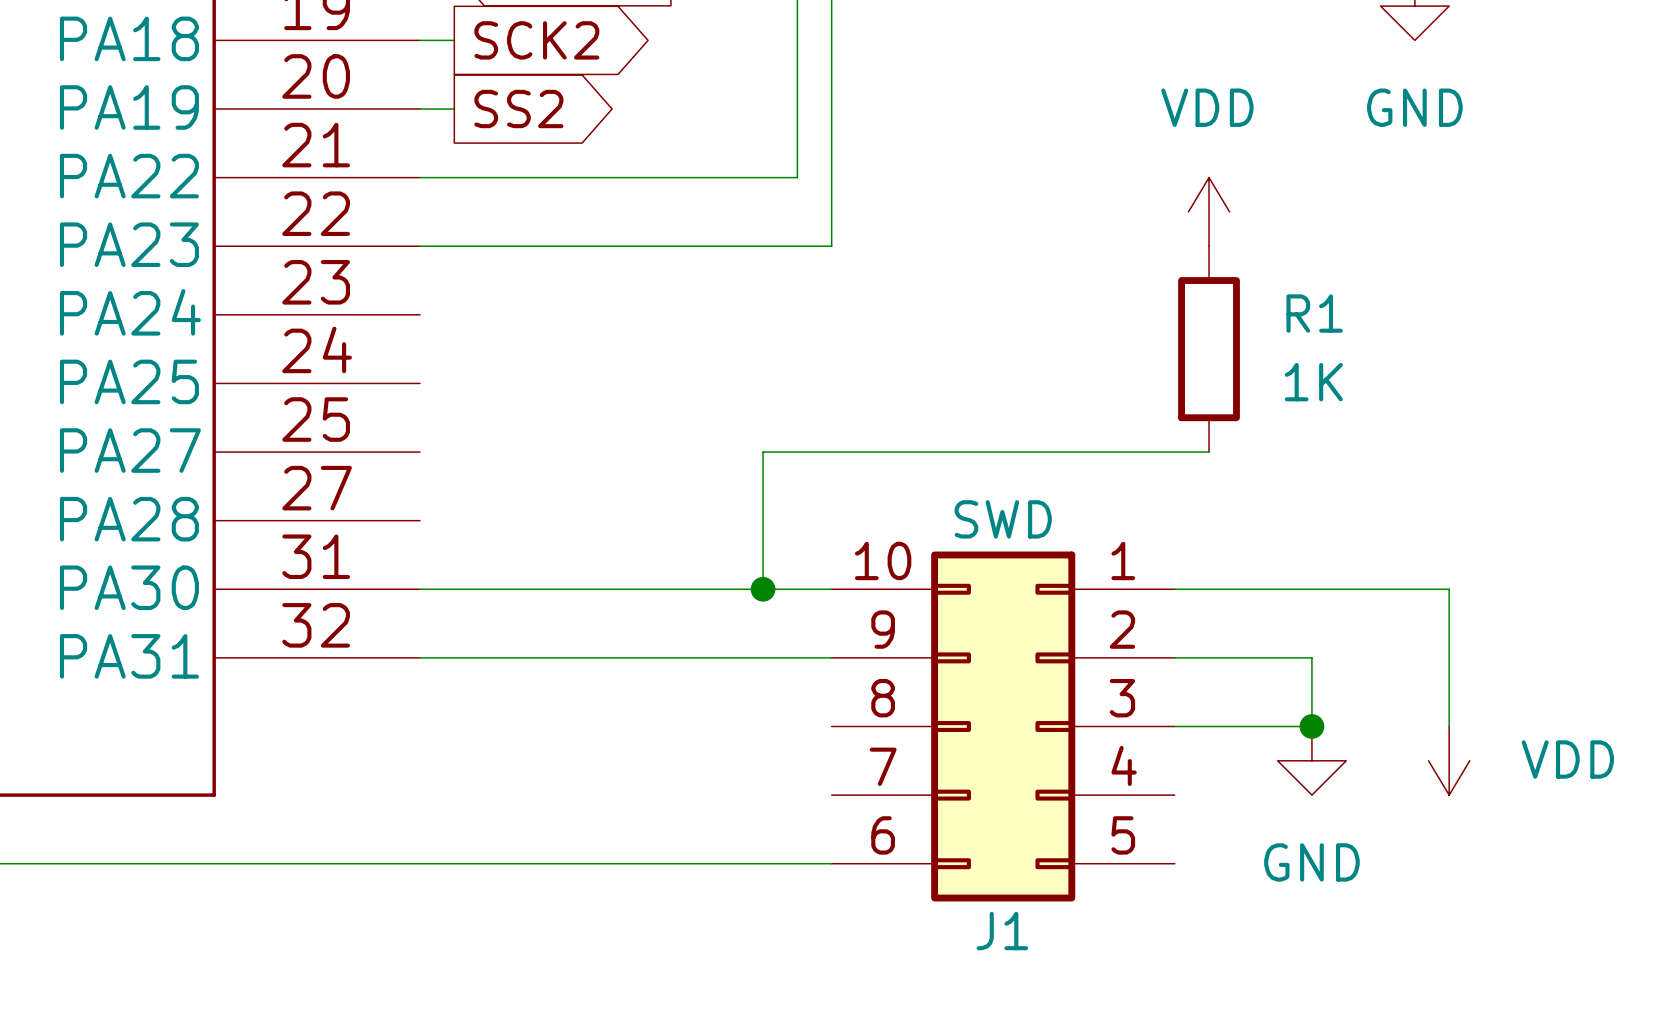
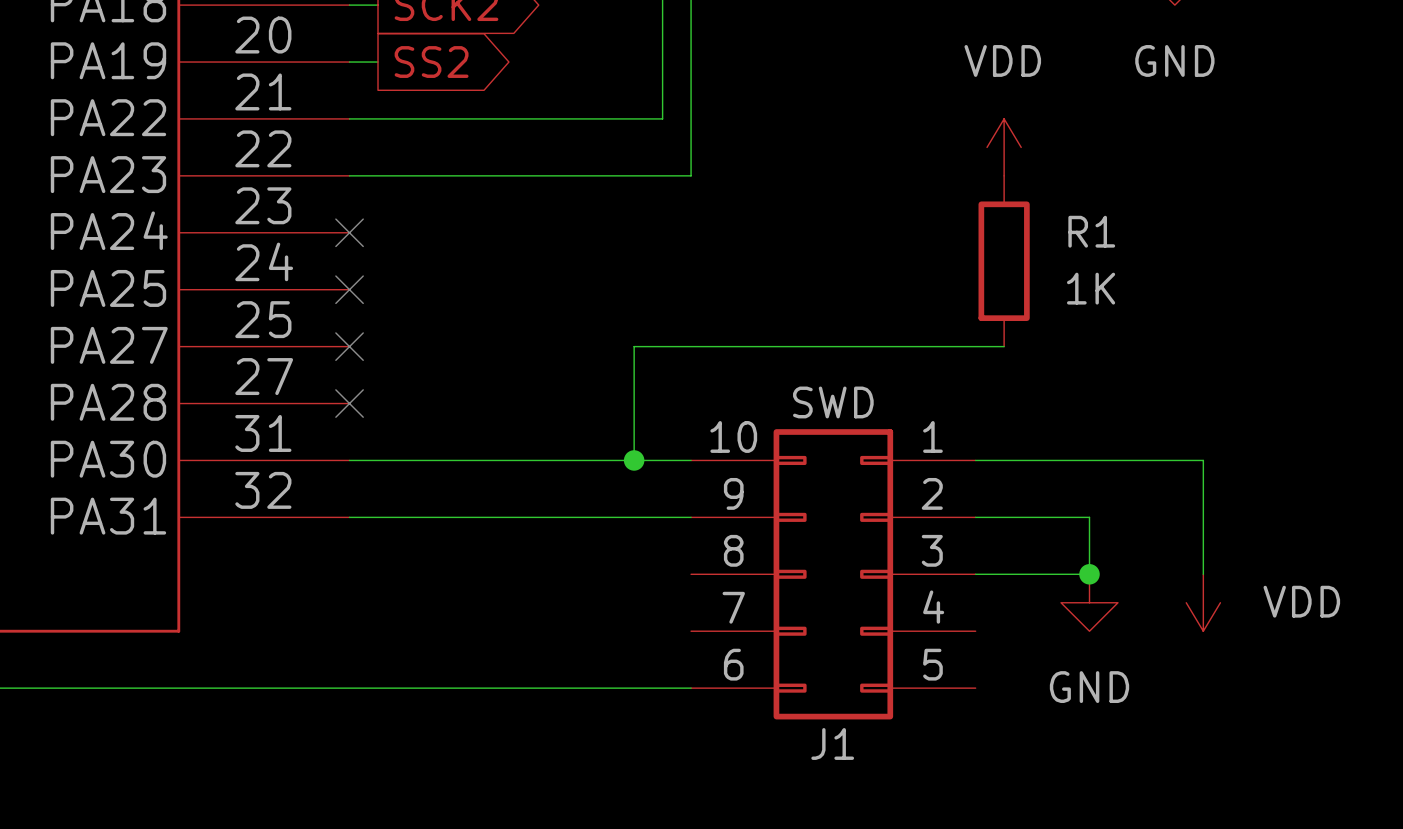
no-connect mark: none -> (349, 232)
no-connect mark: none -> (349, 289)
no-connect mark: none -> (349, 346)
no-connect mark: none -> (349, 403)

